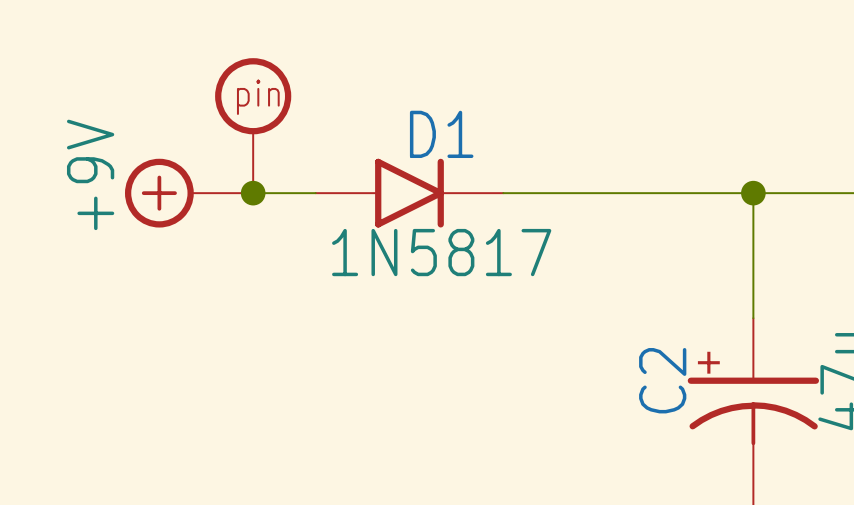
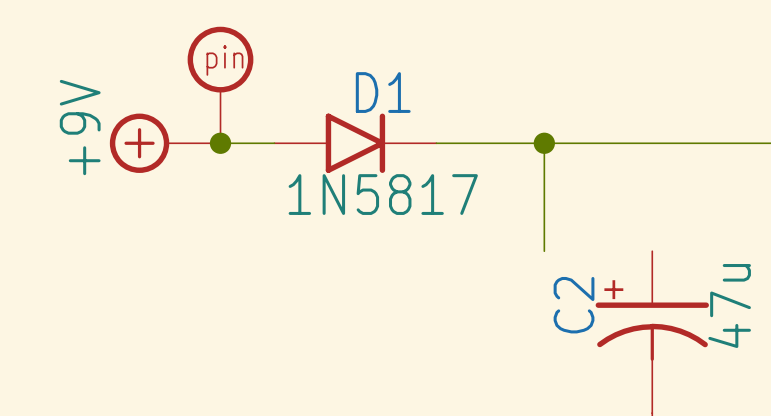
wire: (753, 193) (753, 318) -> (544, 143) (544, 251)
junction position: (753, 193) -> (544, 143)

